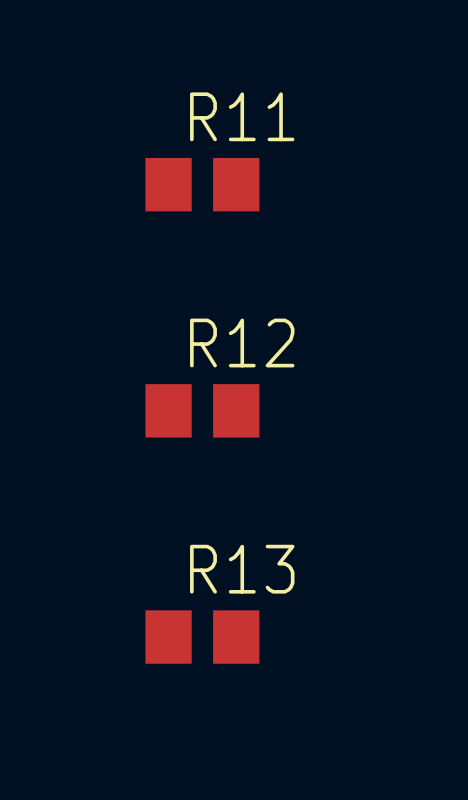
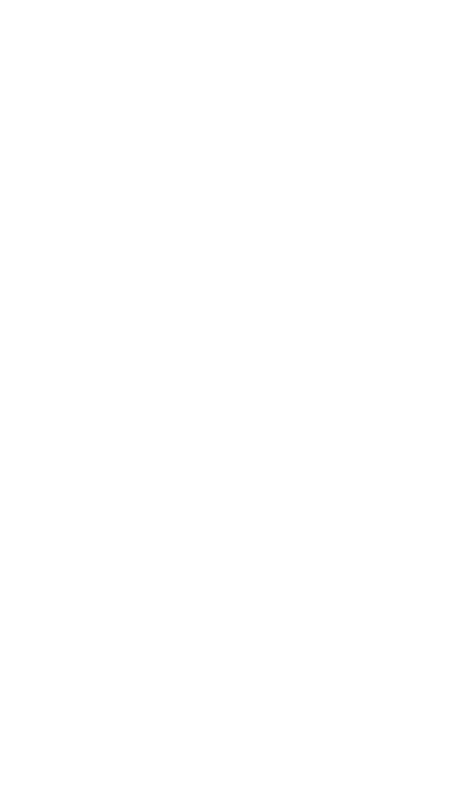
R11: (202, 184) -> none
R12: (202, 410) -> none
R13: (202, 637) -> none

